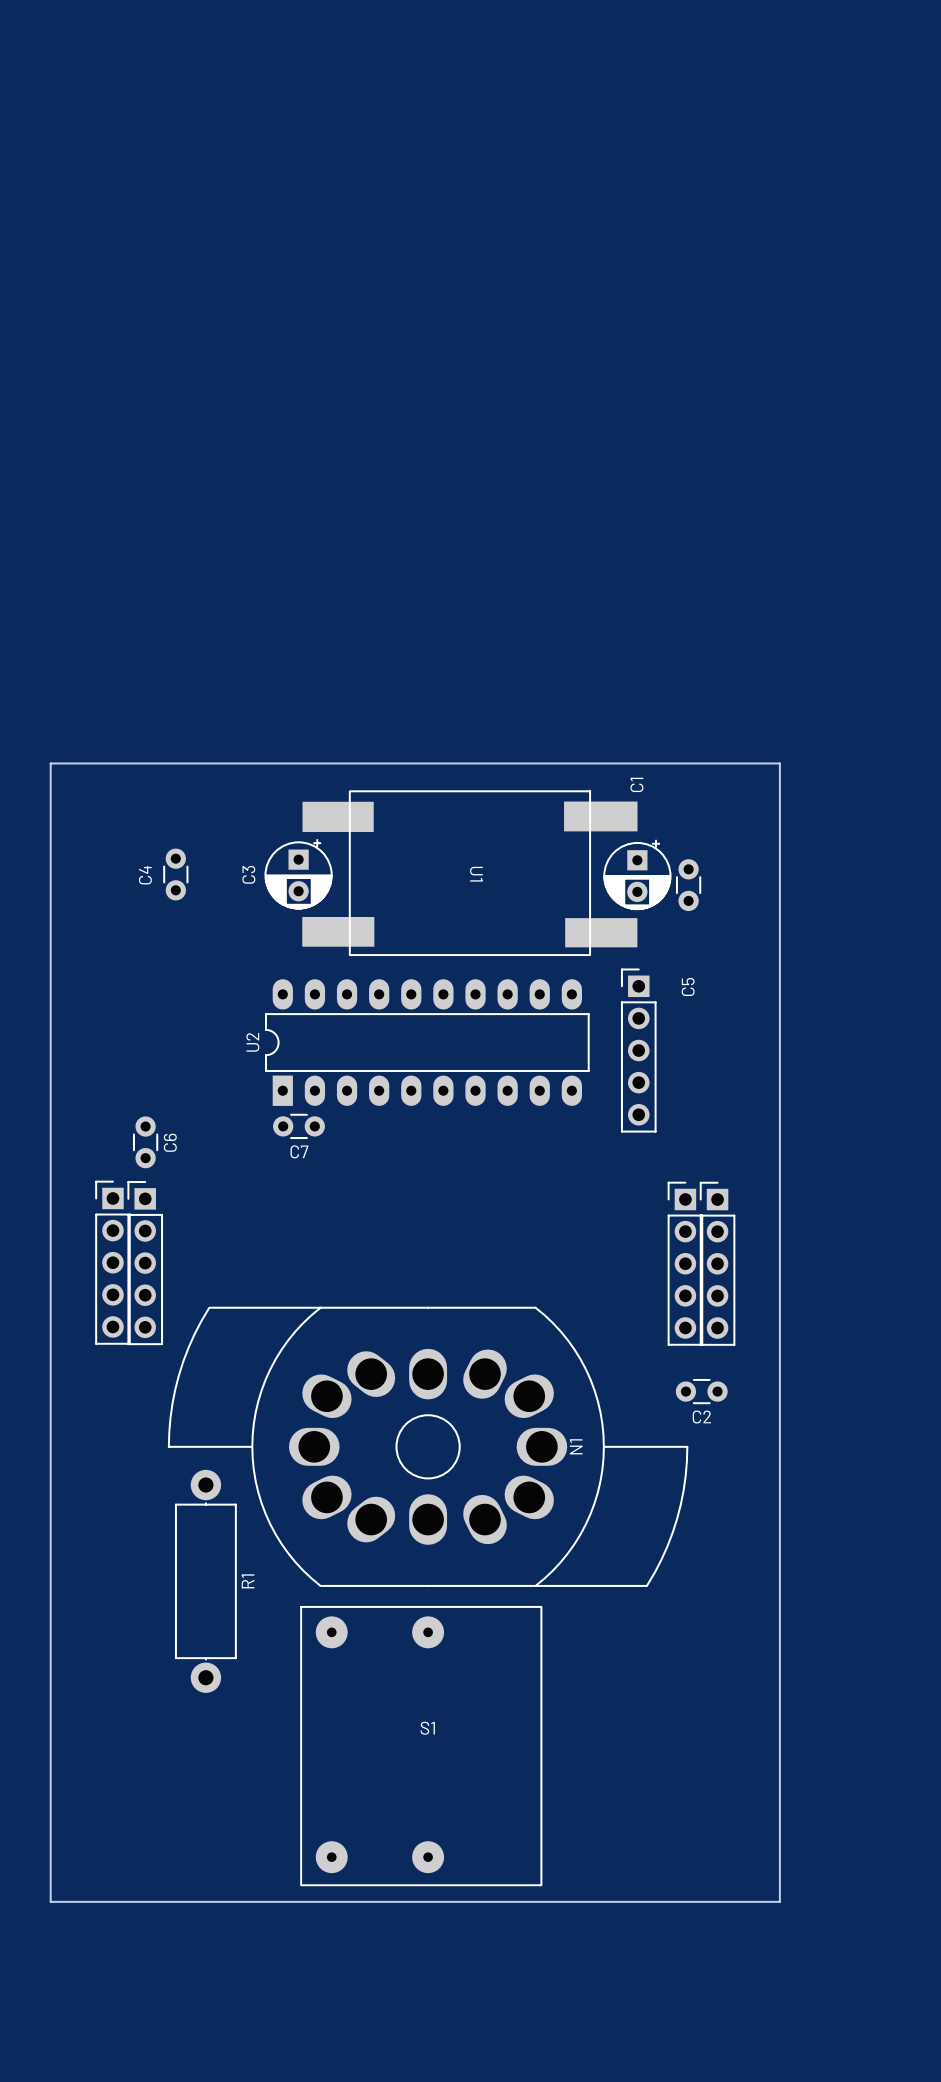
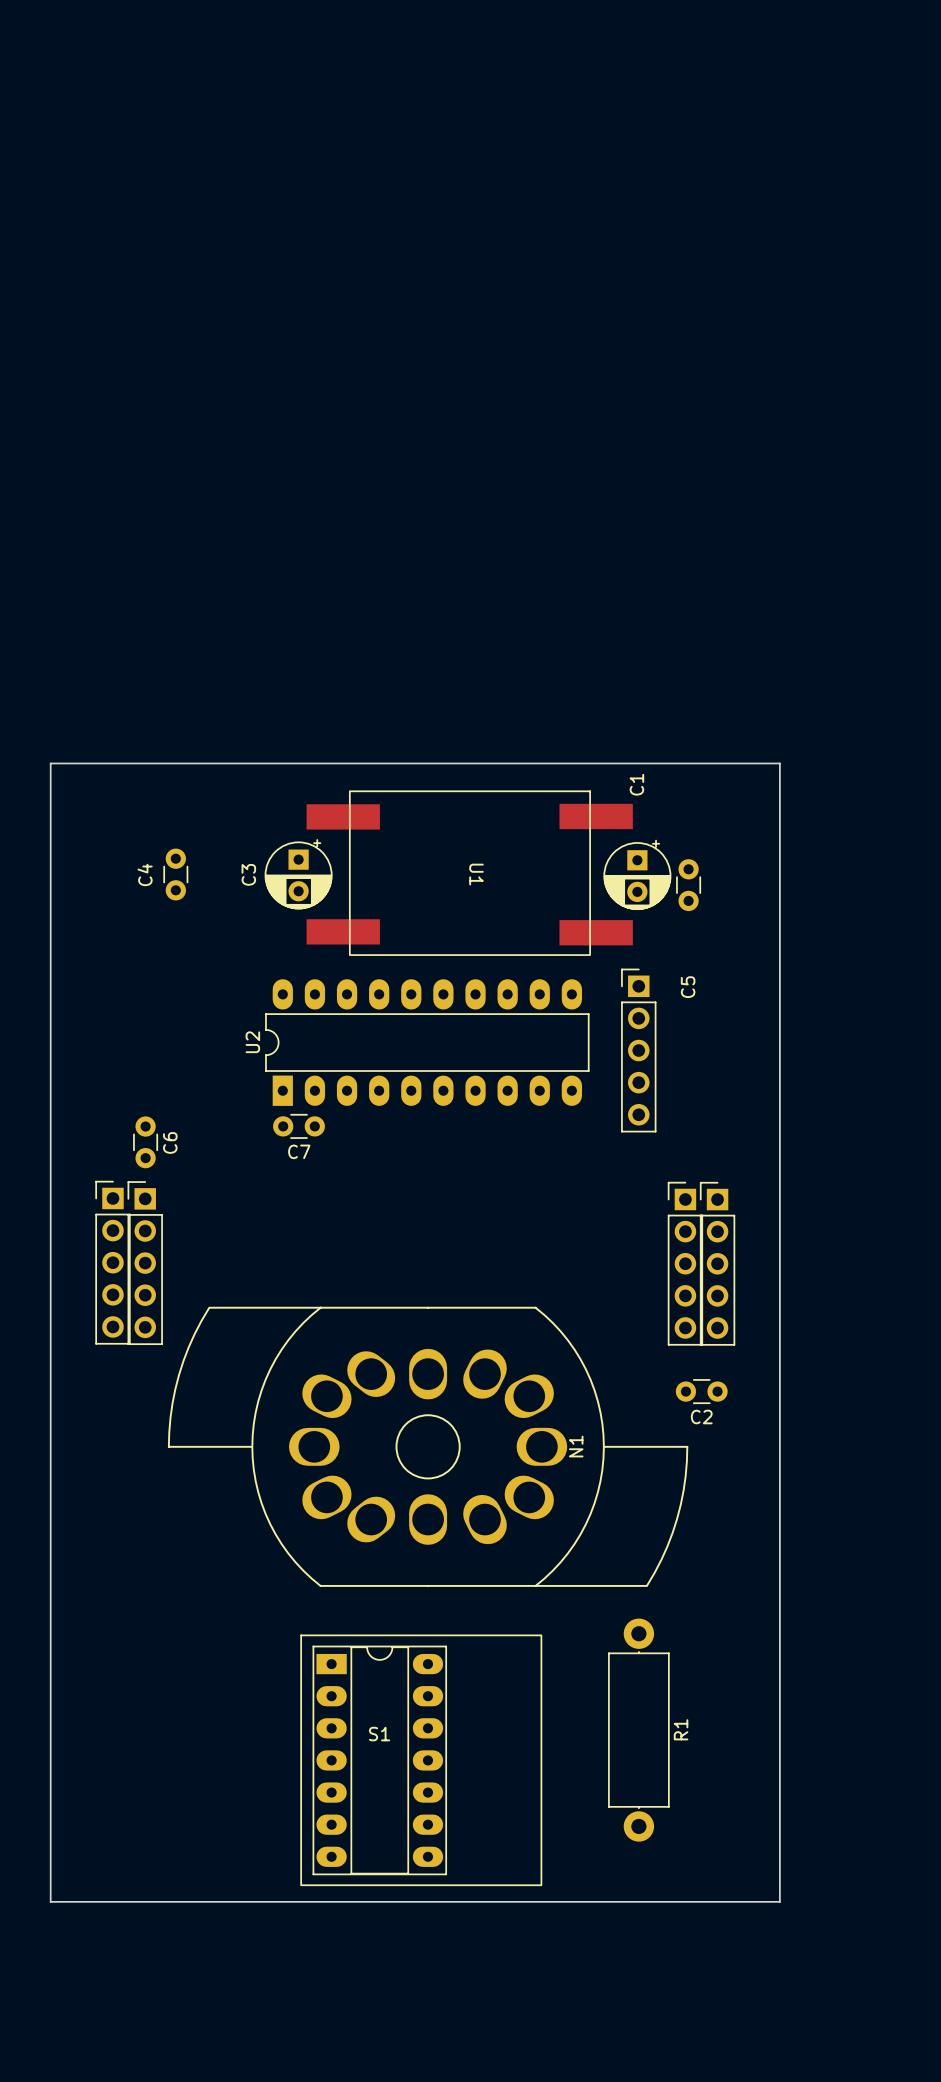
U1 footprint: [302, 790, 638, 956] -> [306, 790, 633, 956]
R1 position: (205, 1581) -> (638, 1730)
S1 footprint: [300, 1606, 543, 1887] -> [300, 1634, 543, 1887]
S1 name position: S1 (427, 1728) -> S1 (379, 1734)

